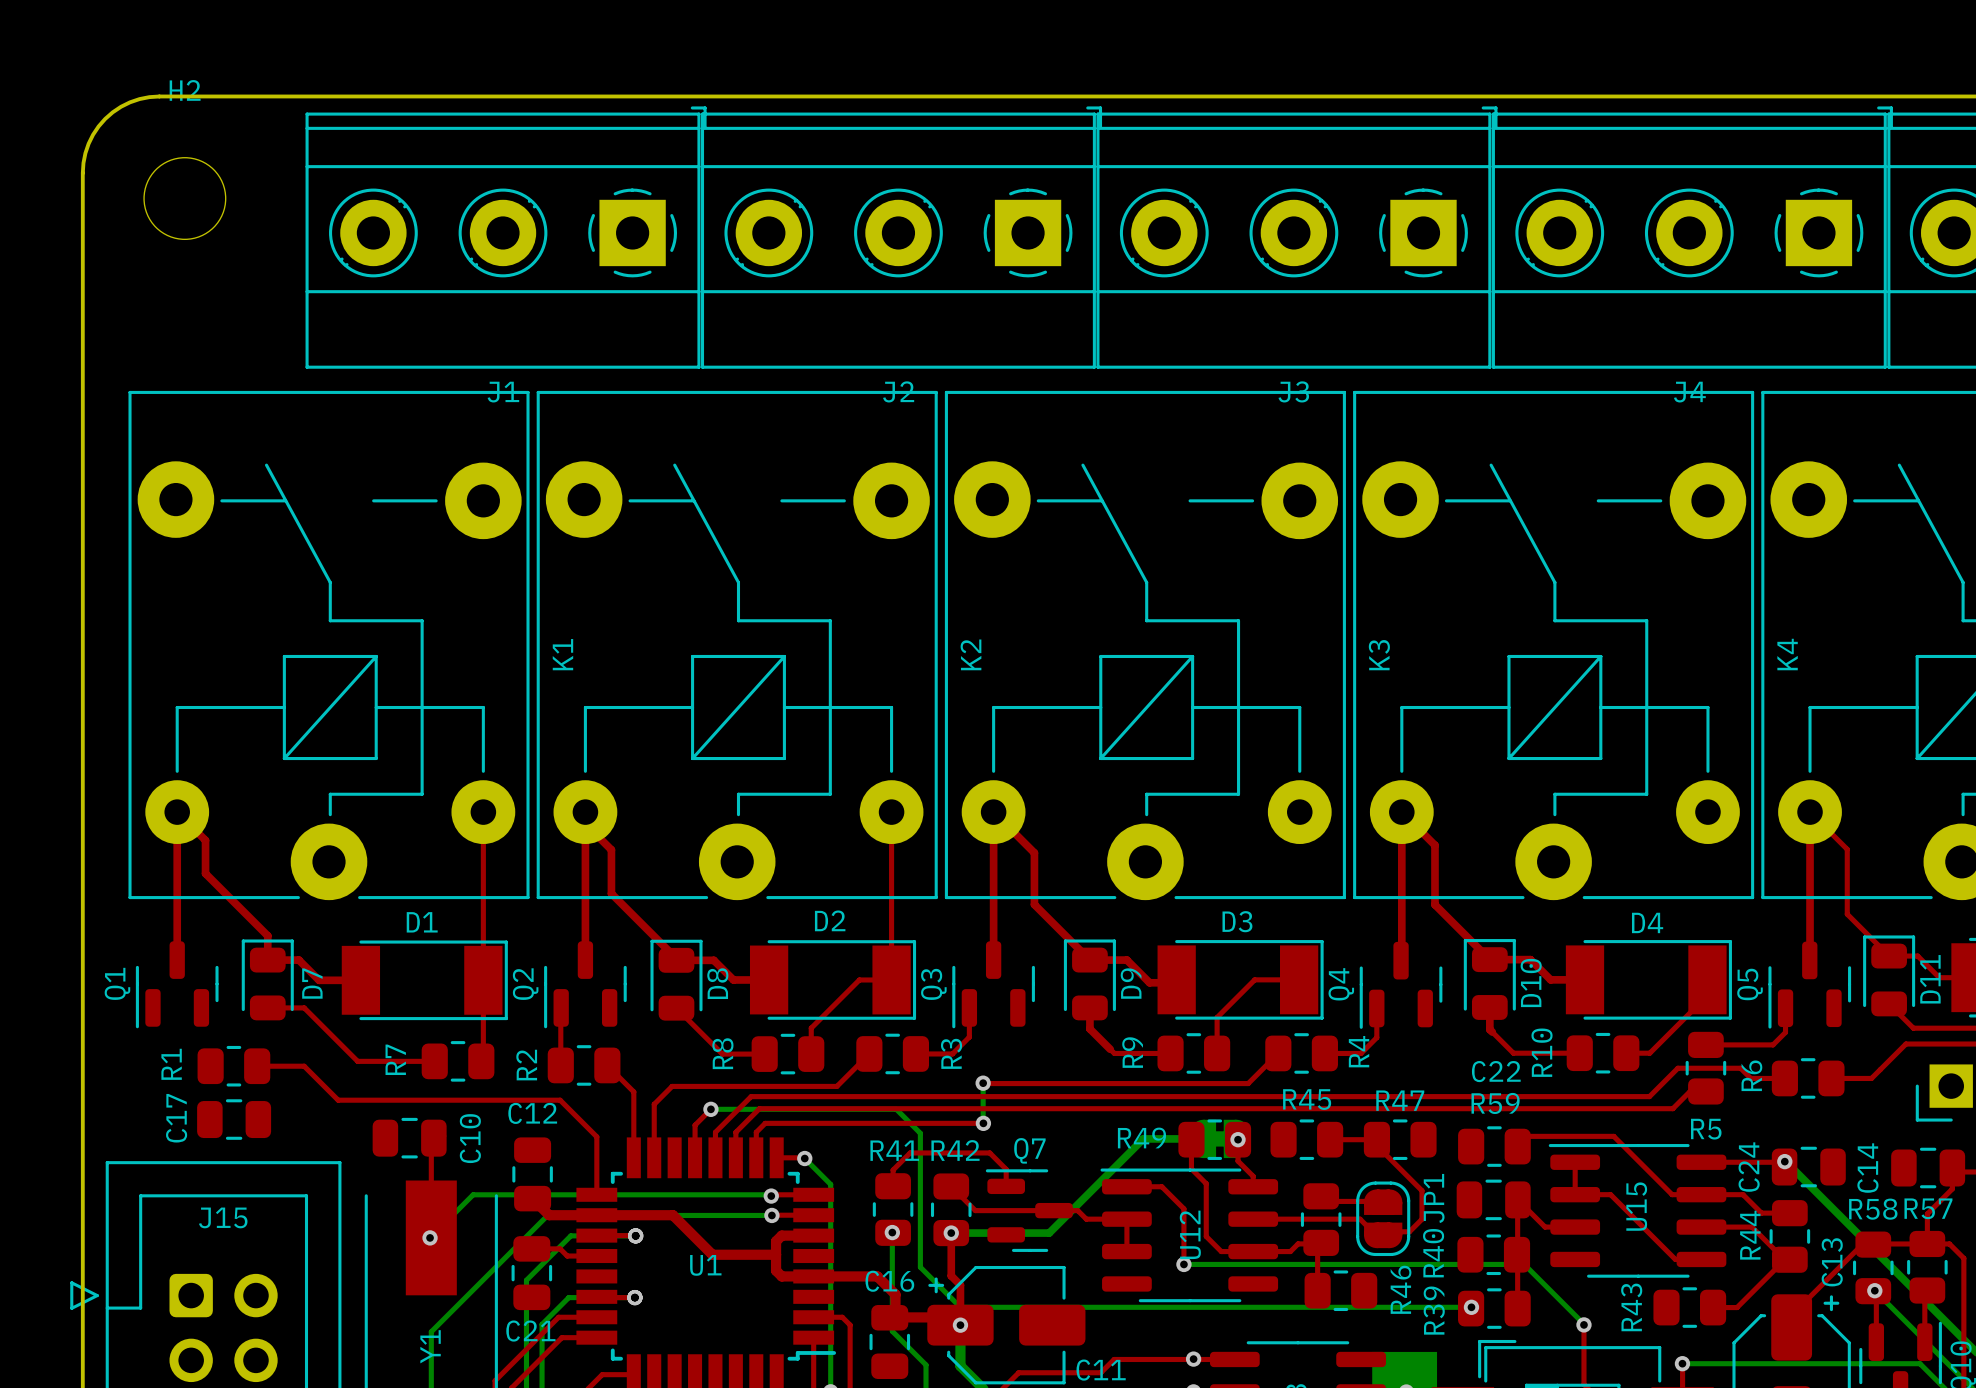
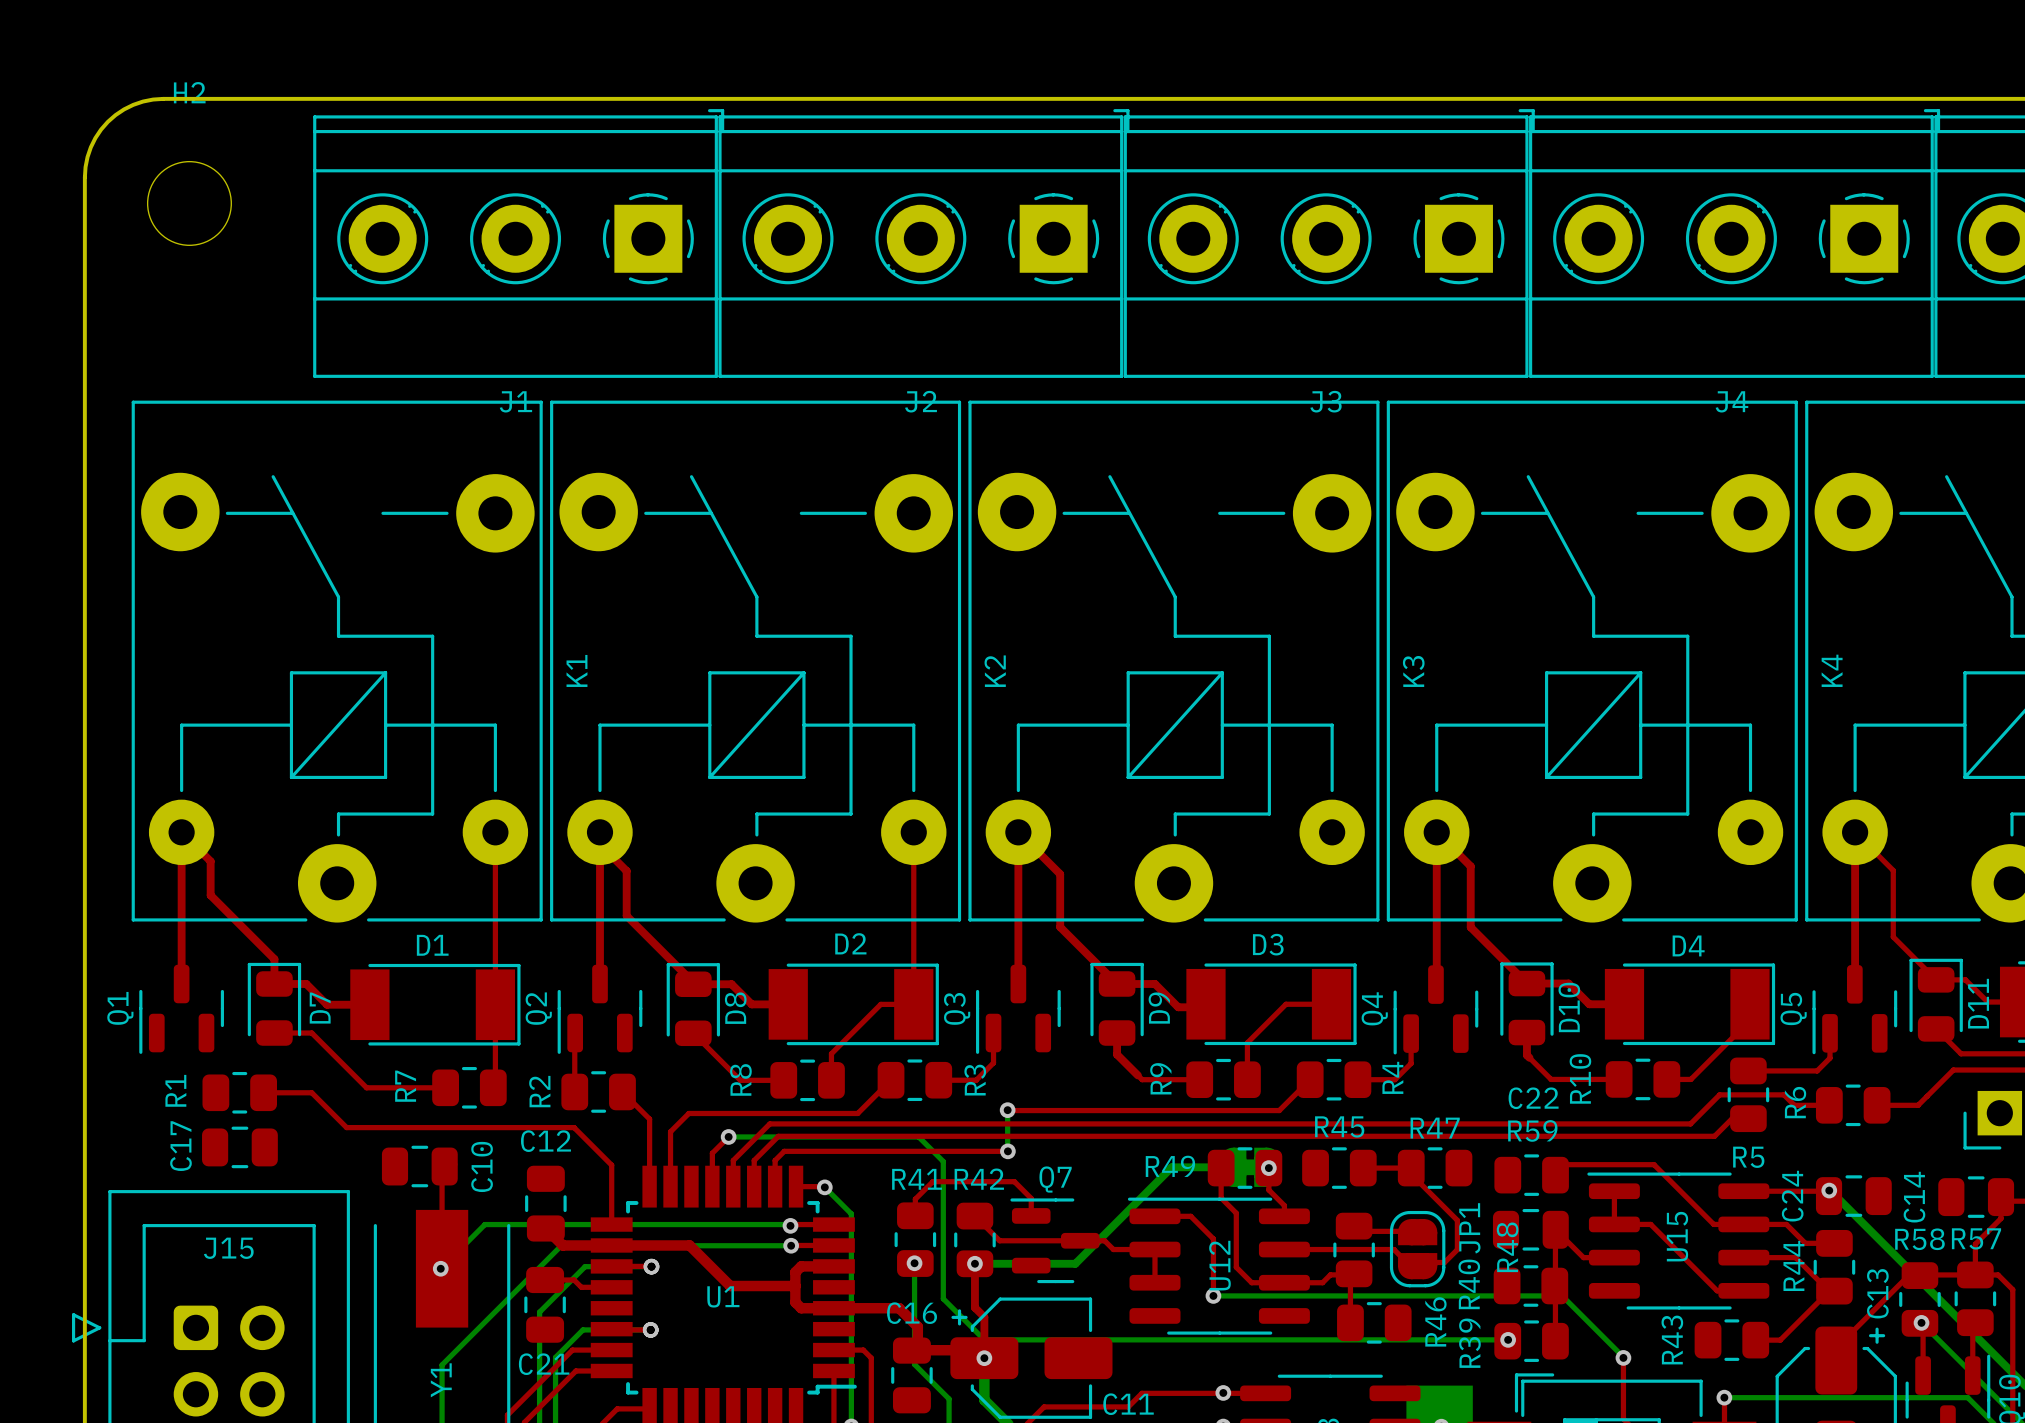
R48 name: none -> R48 (1507, 1247)

